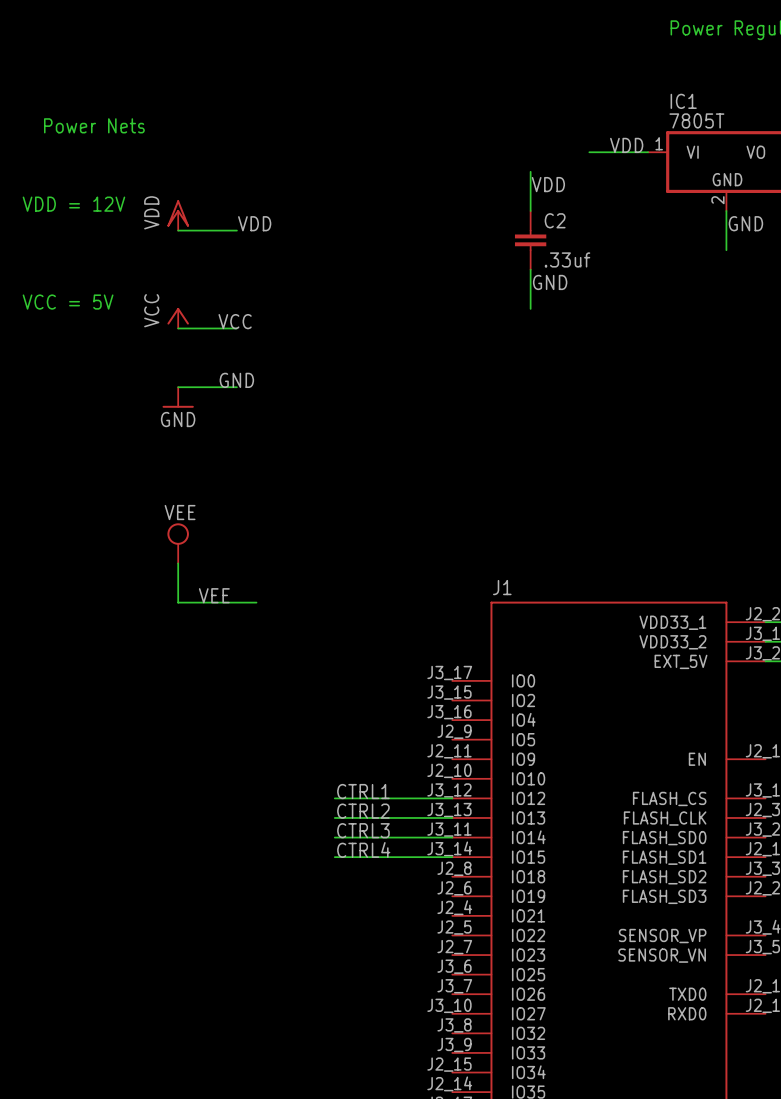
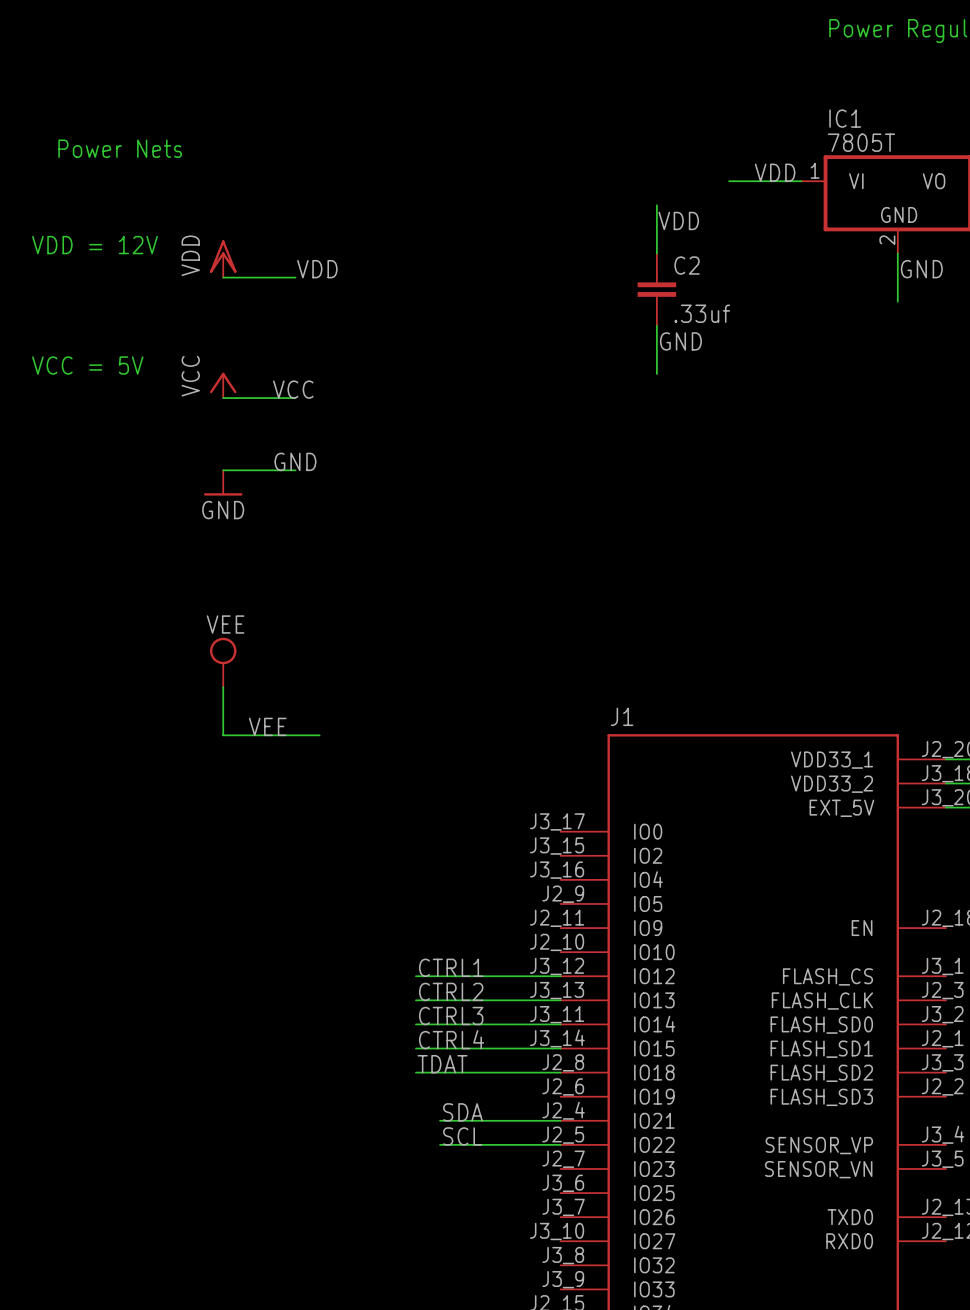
label: none -> TDAT (442, 1064)
wire: none -> (415, 1072) (560, 1072)
label: none -> SDA (463, 1112)
wire: none -> (440, 1120) (560, 1120)
label: none -> SCL (462, 1136)
wire: none -> (440, 1144) (560, 1144)

